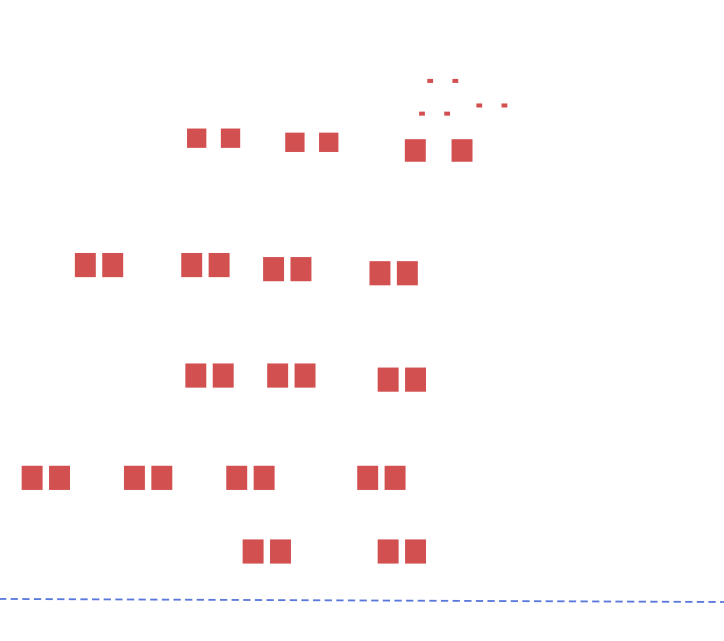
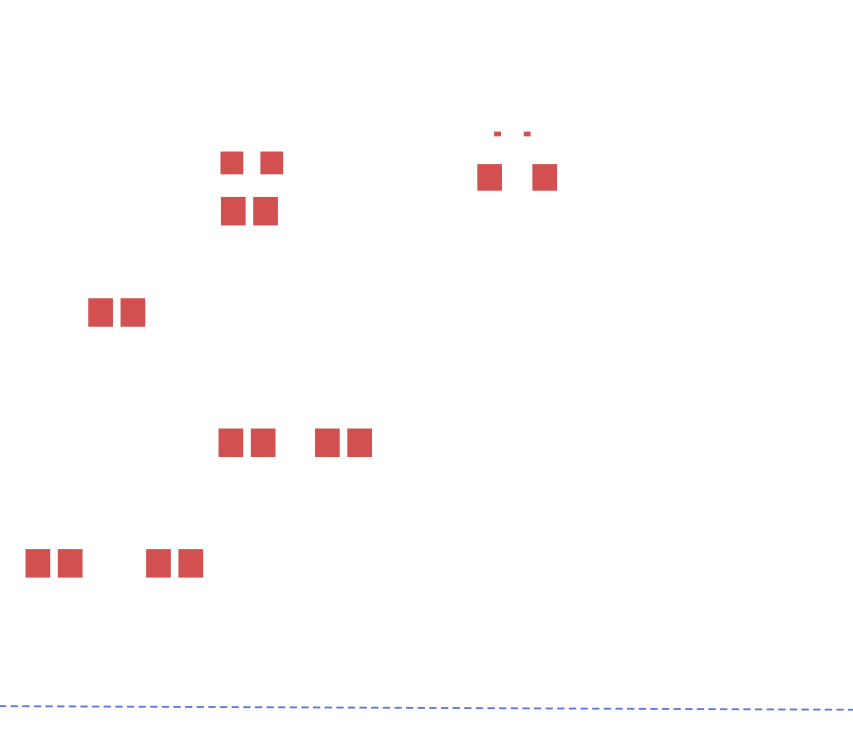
part: (442, 80) -> none
part: (491, 105) -> none
part: (311, 142) -> none
part: none -> (249, 211)
part: (205, 265) -> none
part: (287, 269) -> none
part: (393, 273) -> none
part: (401, 379) -> none
part: (250, 477) -> none
part: (381, 477) -> none
part: (266, 551) -> none
part: (401, 551) -> none

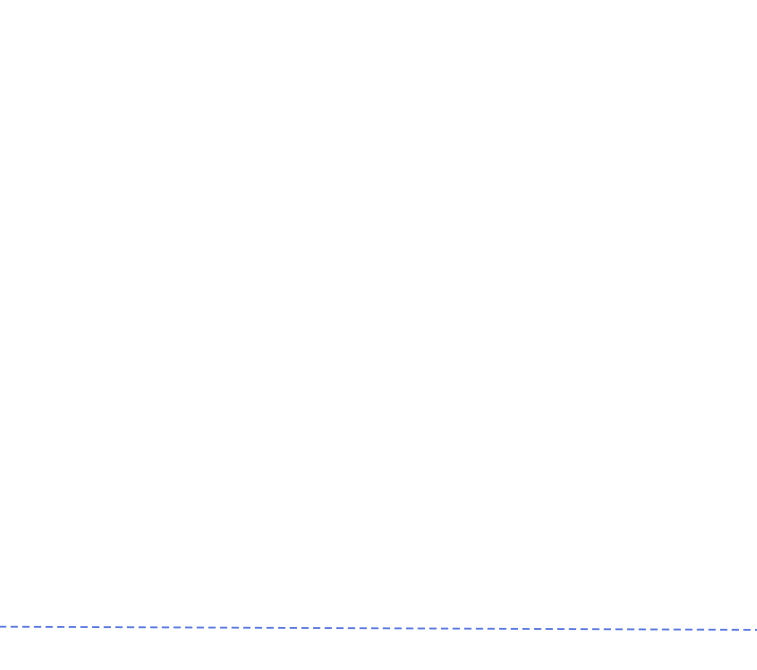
part: (512, 133) -> none
part: (251, 162) -> none
part: (517, 177) -> none
part: (249, 211) -> none
part: (116, 312) -> none
part: (247, 442) -> none
part: (343, 442) -> none
part: (54, 563) -> none
part: (174, 563) -> none

